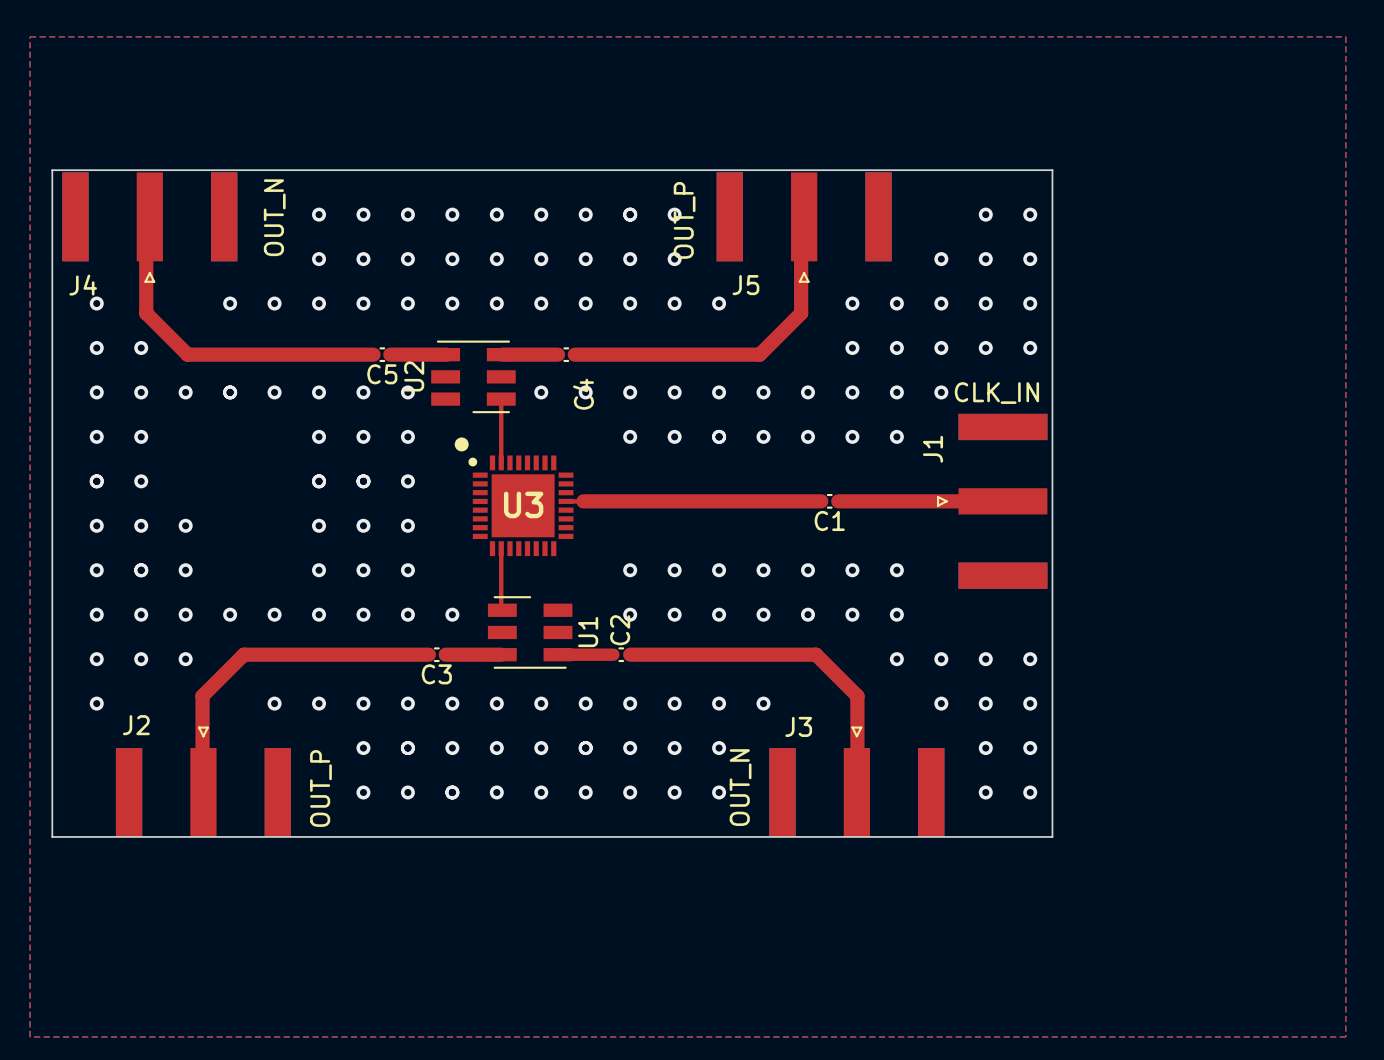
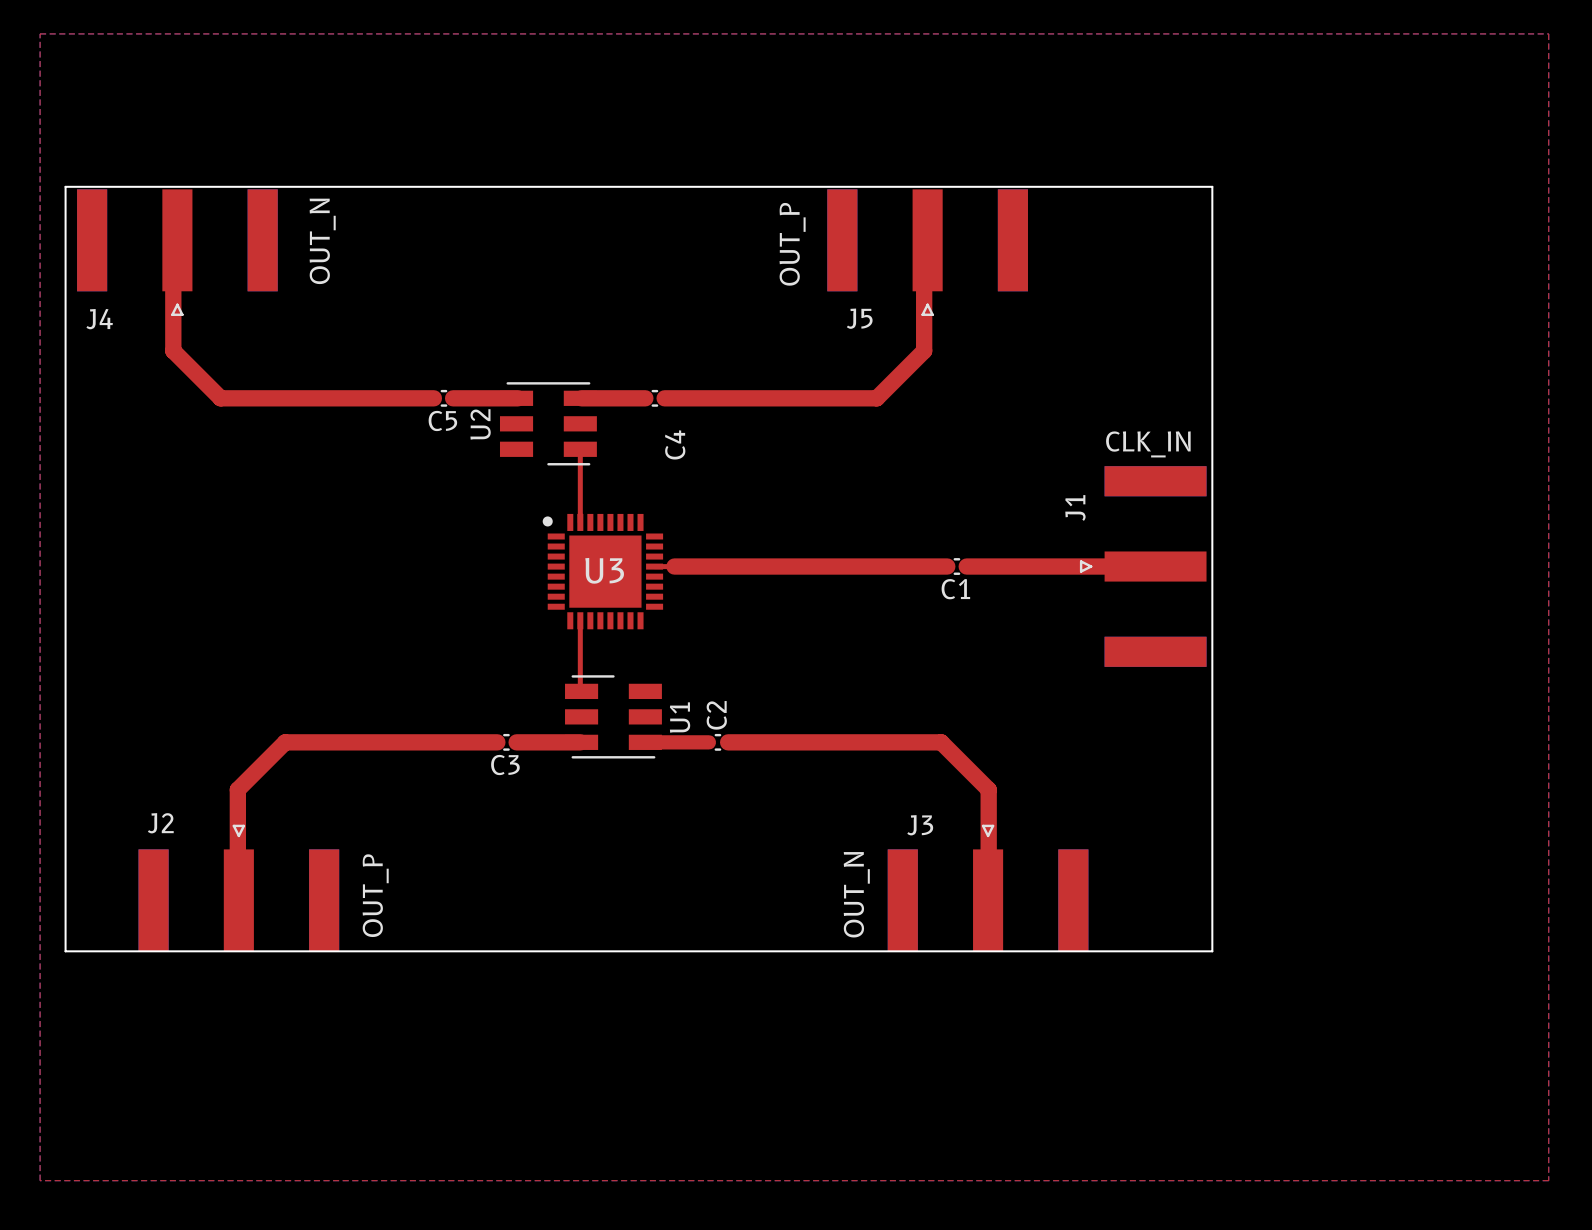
via: (319, 214) -> none
via: (363, 214) -> none
via: (407, 214) -> none
via: (452, 214) -> none
via: (496, 214) -> none
via: (541, 214) -> none
via: (585, 214) -> none
via: (630, 214) -> none
via: (674, 214) -> none
via: (985, 214) -> none
via: (1030, 214) -> none
via: (319, 259) -> none
via: (363, 259) -> none
via: (407, 259) -> none
via: (452, 259) -> none
via: (496, 259) -> none
via: (541, 259) -> none
via: (585, 259) -> none
via: (630, 259) -> none
via: (674, 259) -> none
via: (941, 259) -> none
via: (985, 259) -> none
via: (1030, 259) -> none
via: (96, 303) -> none
via: (230, 303) -> none
via: (274, 303) -> none
via: (319, 303) -> none
via: (363, 303) -> none
via: (407, 303) -> none
via: (452, 303) -> none
via: (496, 303) -> none
via: (541, 303) -> none
via: (585, 303) -> none
via: (630, 303) -> none
via: (674, 303) -> none
via: (719, 303) -> none
via: (852, 303) -> none
via: (896, 303) -> none
via: (941, 303) -> none
via: (985, 303) -> none
via: (1030, 303) -> none
via: (96, 347) -> none
via: (141, 347) -> none
via: (852, 347) -> none
via: (896, 347) -> none
via: (941, 347) -> none
via: (985, 347) -> none
via: (1030, 347) -> none
via: (96, 392) -> none
via: (141, 392) -> none
via: (185, 392) -> none
via: (230, 392) -> none
via: (274, 392) -> none
via: (319, 392) -> none
via: (363, 392) -> none
via: (407, 392) -> none
via: (541, 392) -> none
via: (585, 392) -> none
via: (630, 392) -> none
via: (674, 392) -> none
via: (719, 392) -> none
via: (763, 392) -> none
via: (807, 392) -> none
via: (852, 392) -> none
via: (896, 392) -> none
via: (941, 392) -> none
via: (96, 436) -> none
via: (141, 436) -> none
via: (319, 436) -> none
via: (363, 436) -> none
via: (407, 436) -> none
via: (630, 436) -> none
via: (674, 436) -> none
via: (719, 436) -> none
via: (763, 436) -> none
via: (807, 436) -> none
via: (852, 436) -> none
via: (896, 436) -> none
drawing: [454, 437, 469, 452] -> none
via: (96, 481) -> none
via: (141, 481) -> none
via: (319, 481) -> none
via: (363, 481) -> none
via: (407, 481) -> none
via: (96, 525) -> none
via: (141, 525) -> none
via: (185, 525) -> none
via: (319, 525) -> none
via: (363, 525) -> none
via: (407, 525) -> none
via: (96, 570) -> none
via: (141, 570) -> none
via: (185, 570) -> none
via: (319, 570) -> none
via: (363, 570) -> none
via: (407, 570) -> none
via: (630, 570) -> none
via: (674, 570) -> none
via: (719, 570) -> none
via: (763, 570) -> none
via: (807, 570) -> none
via: (852, 570) -> none
via: (896, 570) -> none
via: (96, 614) -> none
via: (141, 614) -> none
via: (185, 614) -> none
via: (230, 614) -> none
via: (274, 614) -> none
via: (319, 614) -> none
via: (363, 614) -> none
via: (407, 614) -> none
via: (452, 614) -> none
via: (630, 614) -> none
via: (674, 614) -> none
via: (719, 614) -> none
via: (763, 614) -> none
via: (807, 614) -> none
via: (852, 614) -> none
via: (896, 614) -> none
via: (96, 659) -> none
via: (141, 659) -> none
via: (185, 659) -> none
via: (896, 659) -> none
via: (941, 659) -> none
via: (985, 659) -> none
via: (1030, 659) -> none
via: (96, 703) -> none
via: (274, 703) -> none
via: (319, 703) -> none
via: (363, 703) -> none
via: (407, 703) -> none
via: (452, 703) -> none
via: (496, 703) -> none
via: (541, 703) -> none
via: (585, 703) -> none
via: (630, 703) -> none
via: (674, 703) -> none
via: (719, 703) -> none
via: (763, 703) -> none
via: (941, 703) -> none
via: (985, 703) -> none
via: (1030, 703) -> none
via: (363, 748) -> none
via: (407, 748) -> none
via: (452, 748) -> none
via: (496, 748) -> none
via: (541, 748) -> none
via: (585, 748) -> none
via: (630, 748) -> none
via: (674, 748) -> none
via: (719, 748) -> none
via: (985, 748) -> none
via: (1030, 748) -> none
via: (363, 792) -> none
via: (407, 792) -> none
via: (452, 792) -> none
via: (496, 792) -> none
via: (541, 792) -> none
via: (585, 792) -> none
via: (630, 792) -> none
via: (674, 792) -> none
via: (719, 792) -> none
via: (985, 792) -> none
via: (1030, 792) -> none

